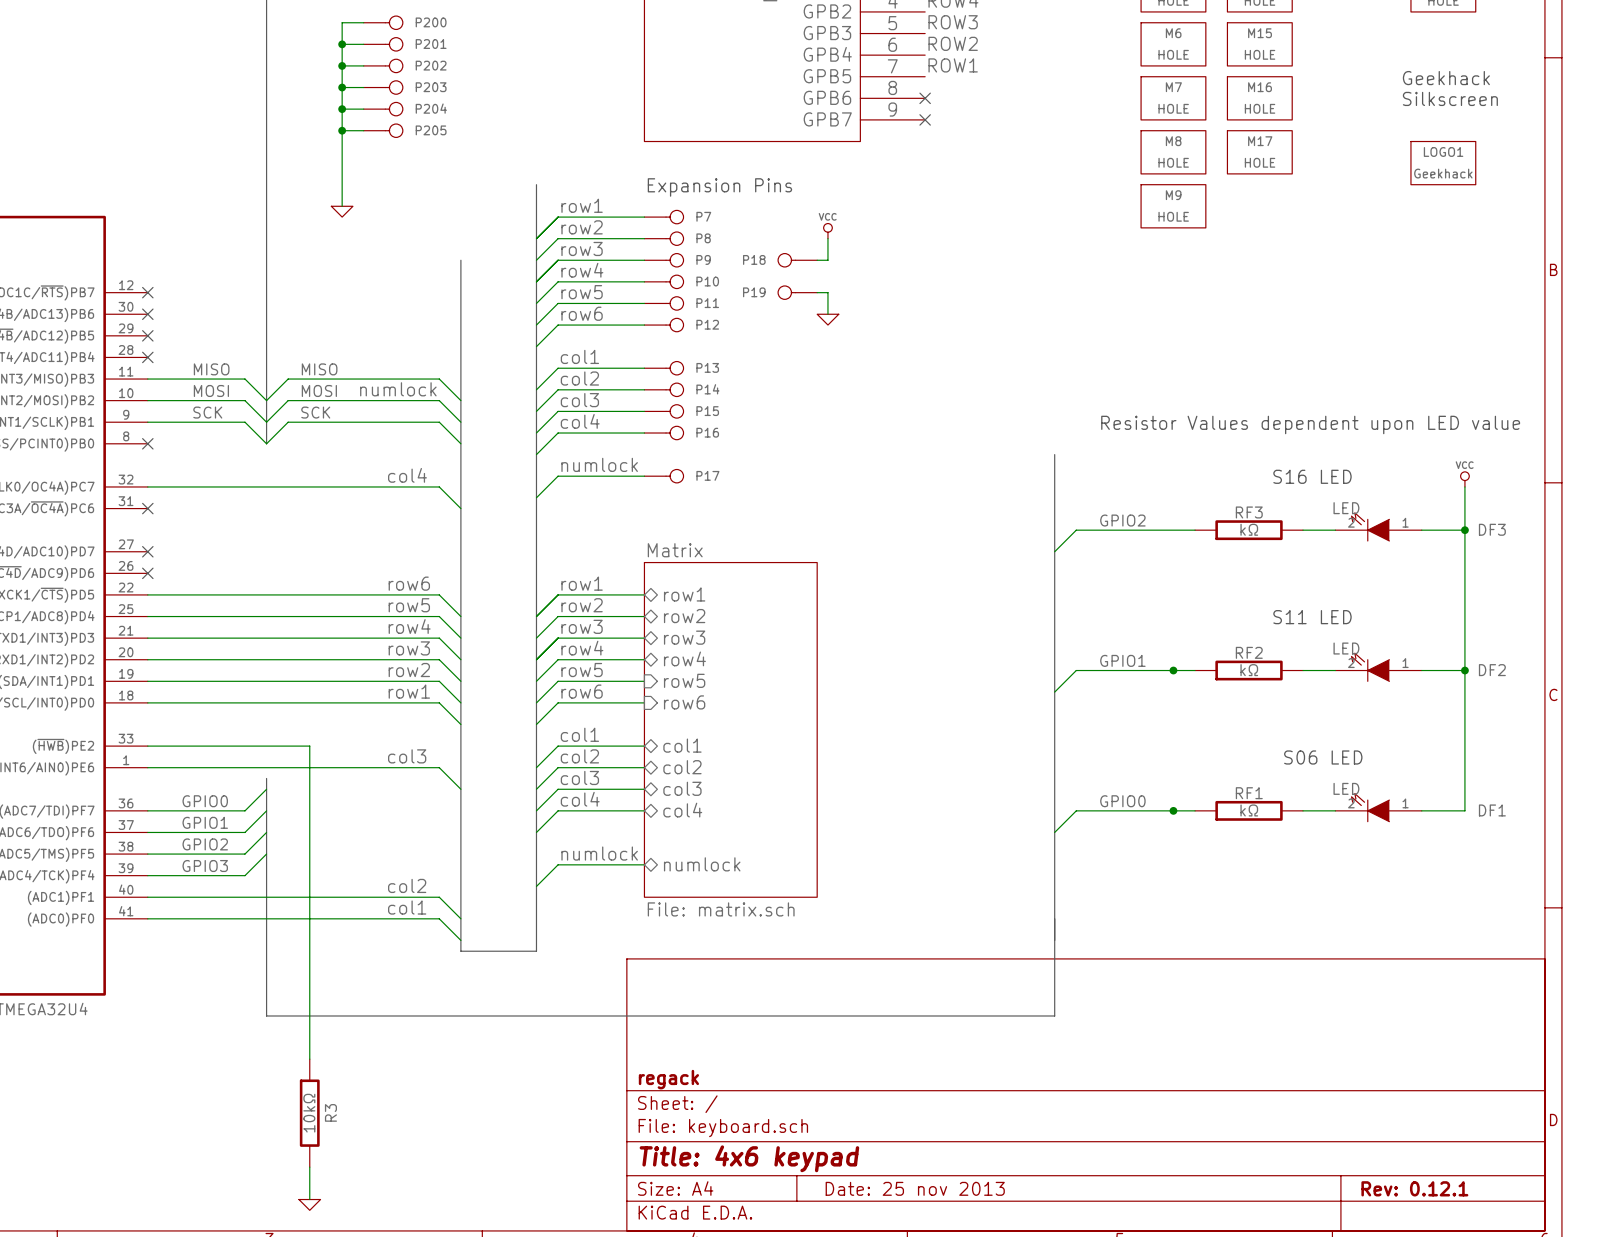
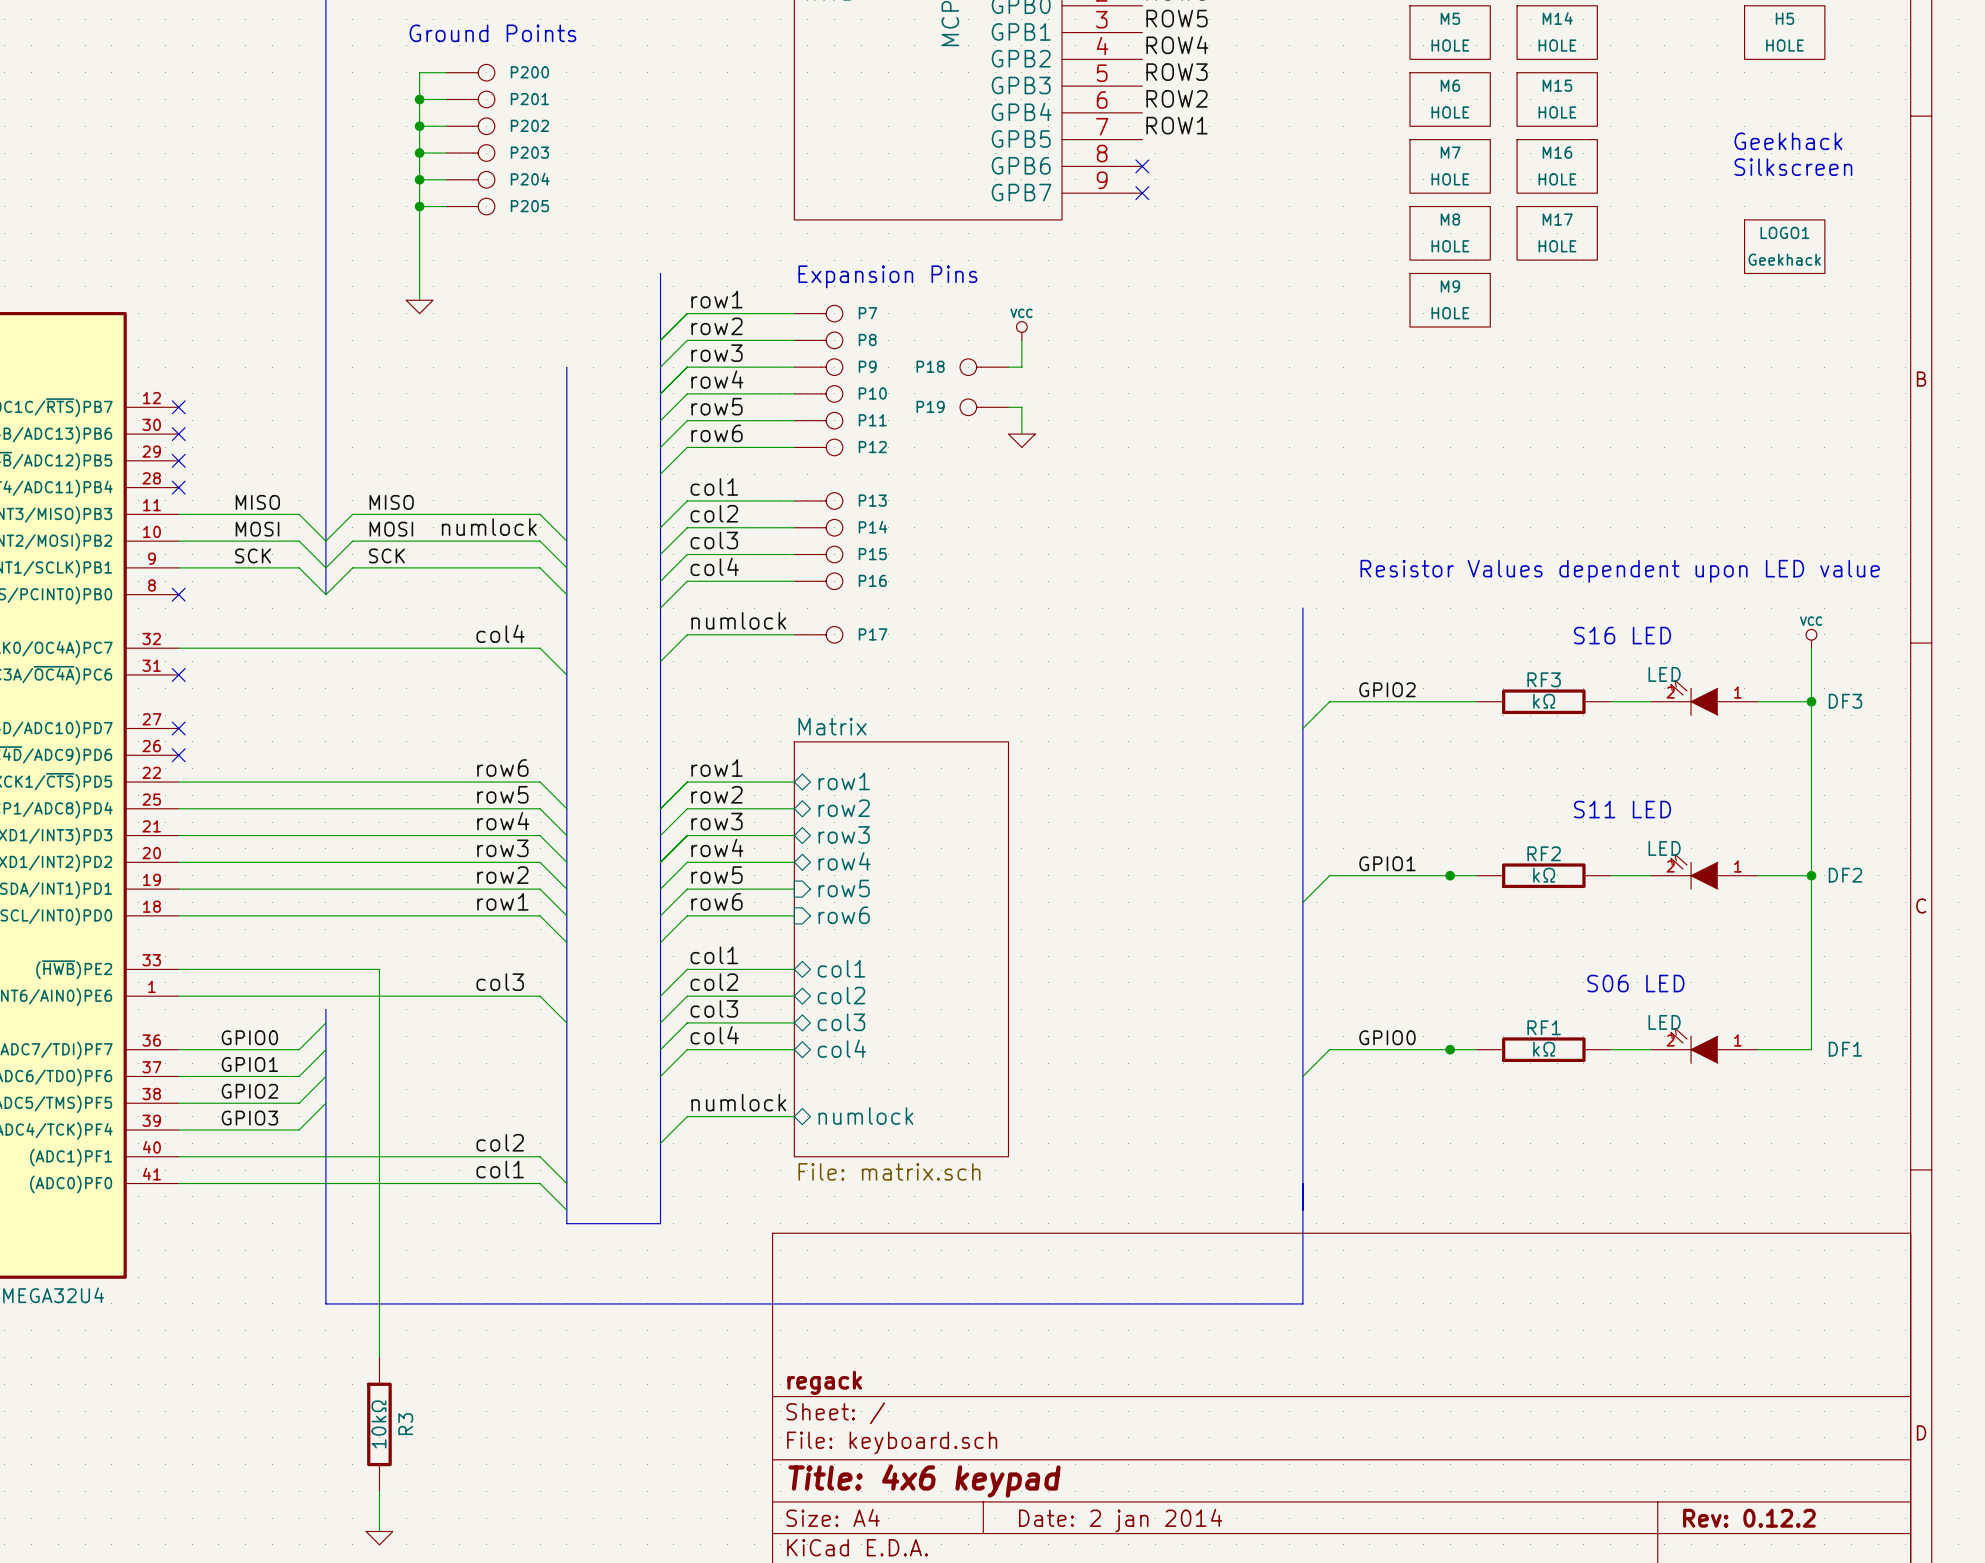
title block: Date: 25 nov 2013 (915, 1188) -> Date: 2 jan 2014 (1120, 1520)
title block: Rev: 0.12.1 (1414, 1188) -> Rev: 0.12.2 (1749, 1518)

